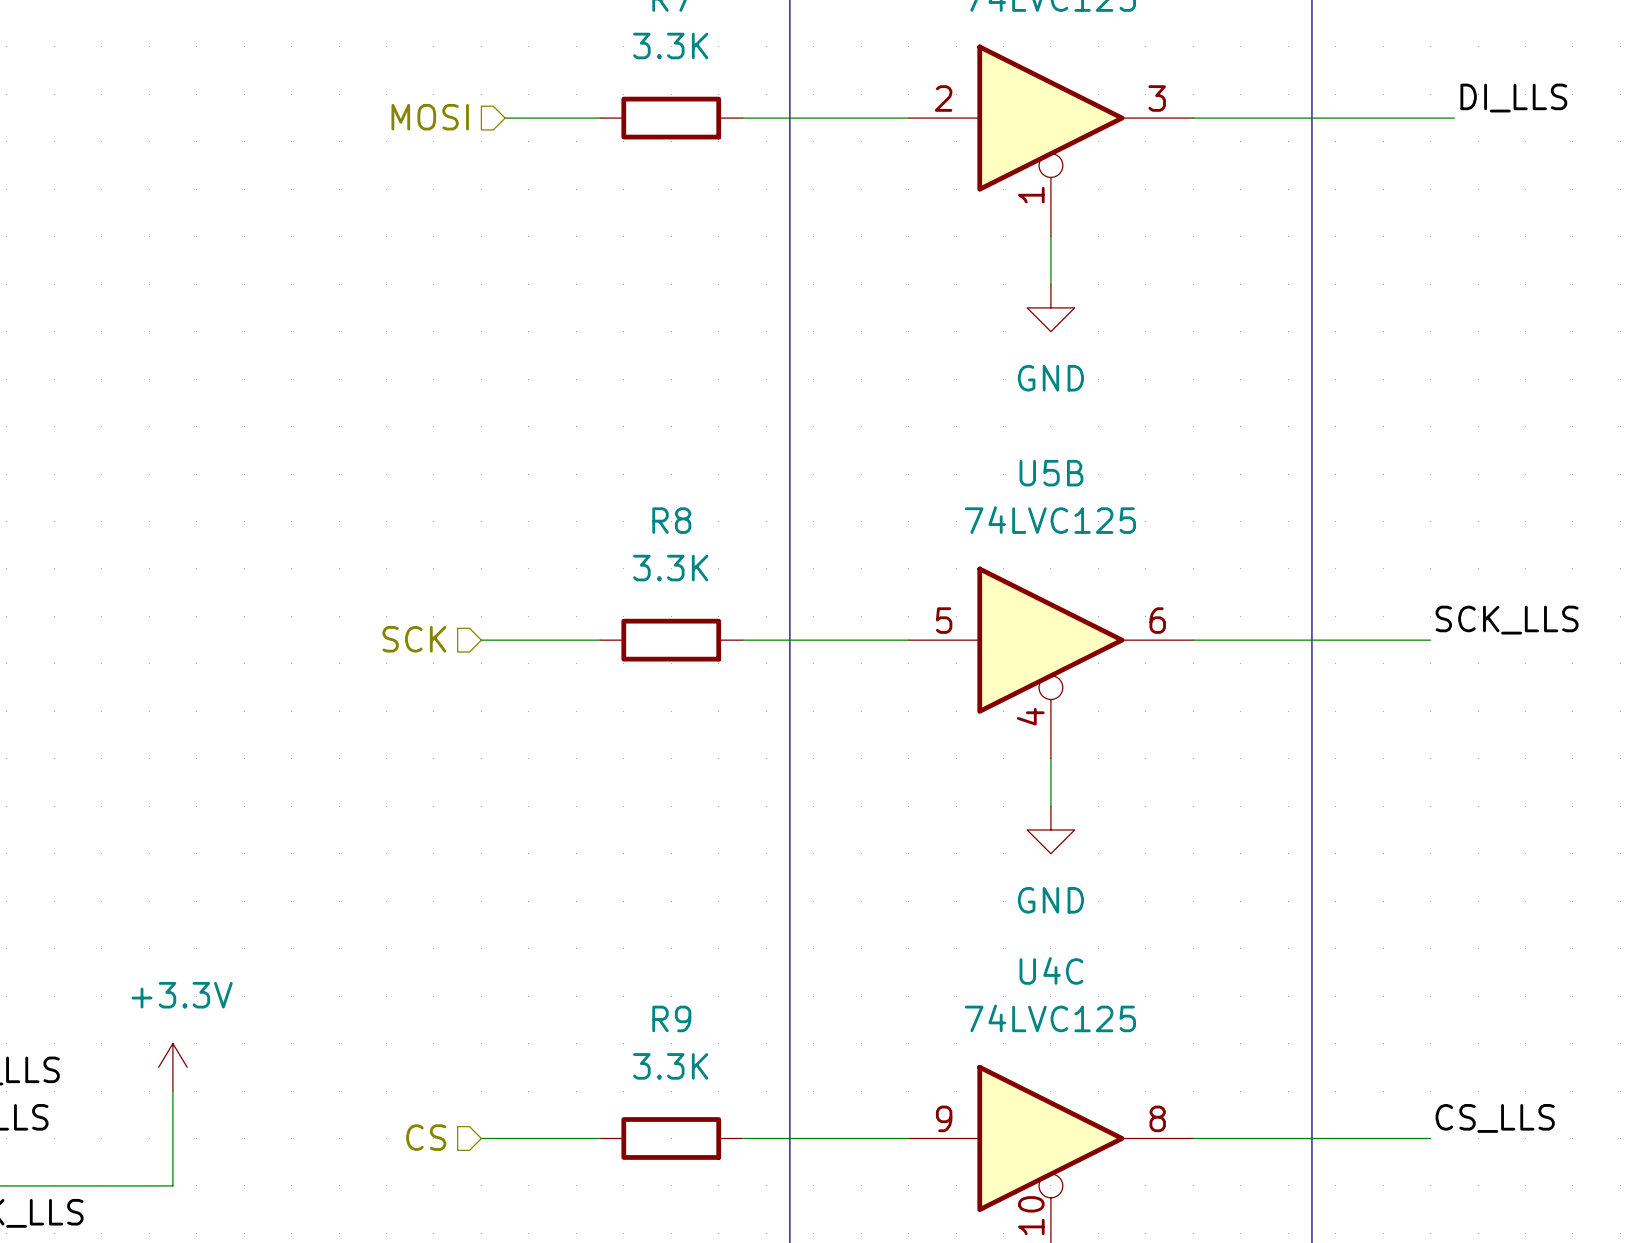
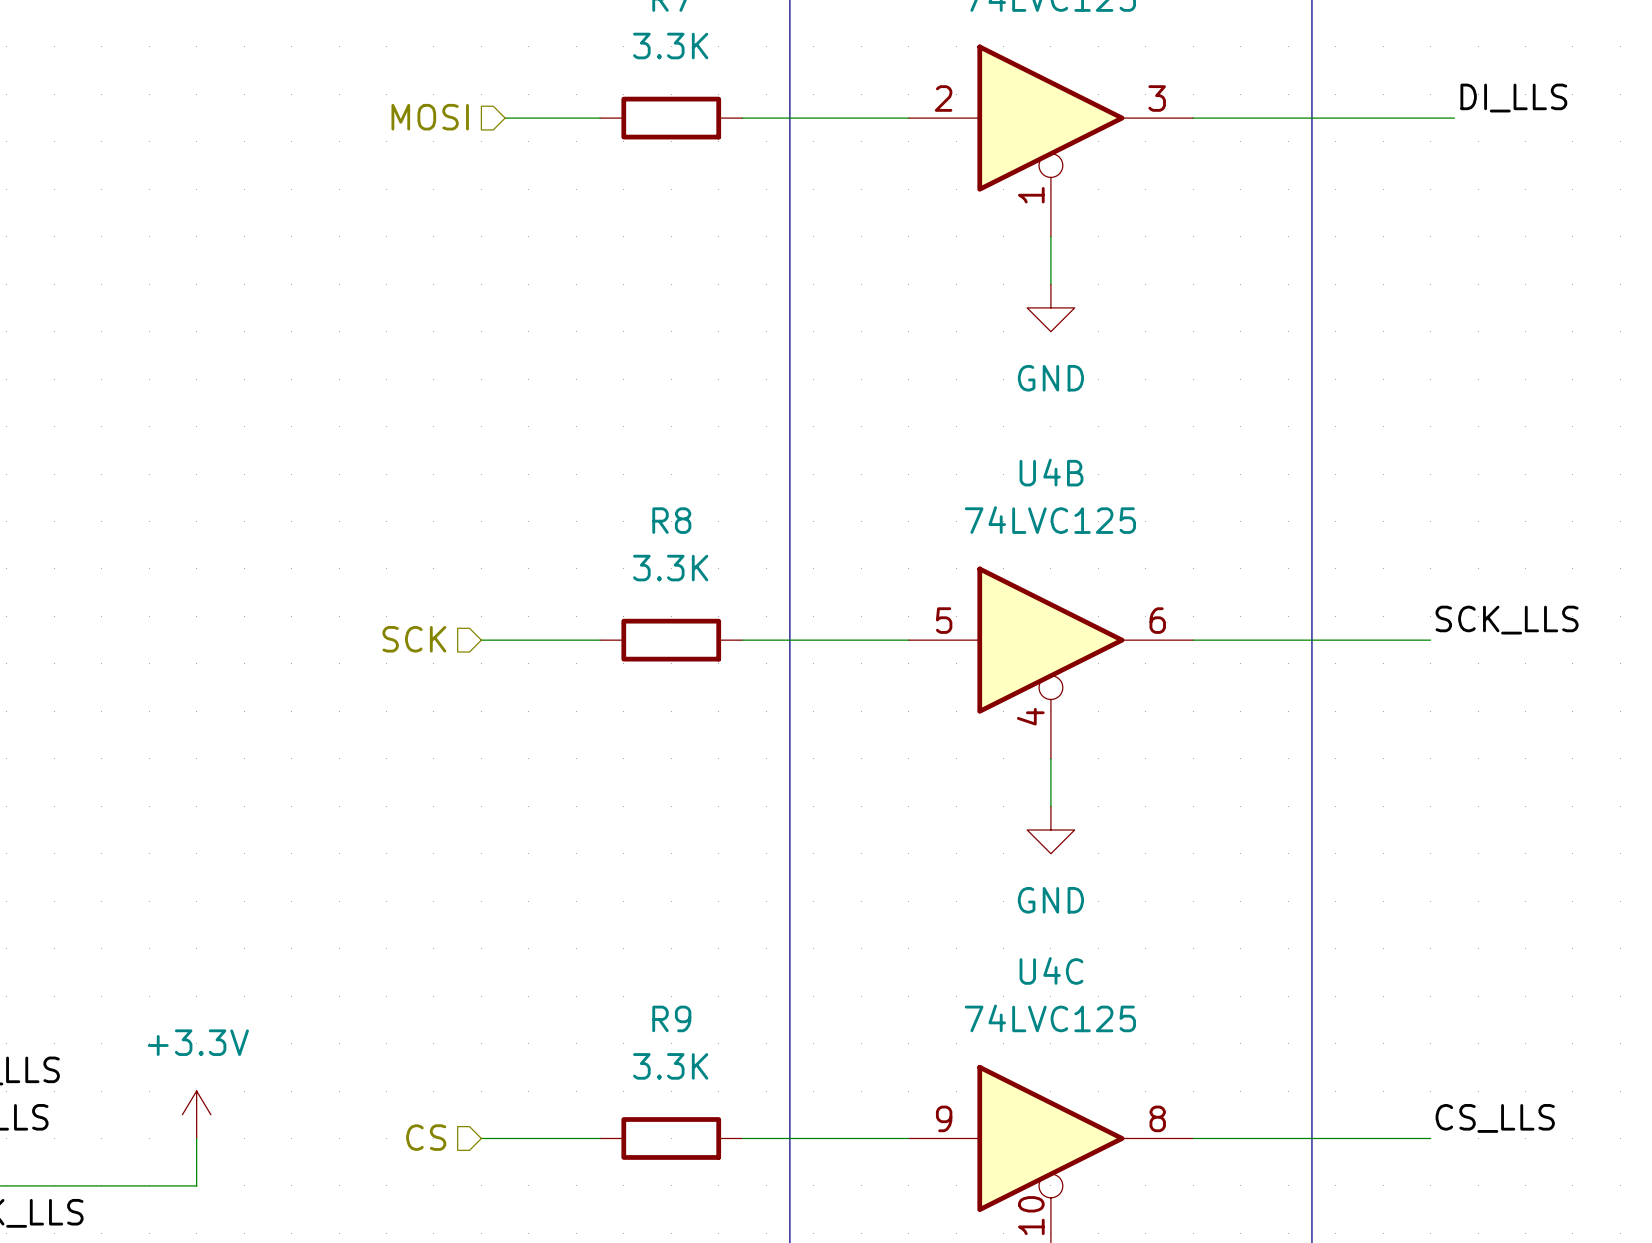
U5B name: U5B (1051, 473) -> U4B (1051, 472)
power symbol text position: +3.3V (182, 995) -> +3.3V (198, 1042)
power symbol position: +3.3V (172, 1067) -> +3.3V (196, 1114)
wire: (172, 1091) (172, 1185) -> (196, 1138) (196, 1185) (172, 1185)

